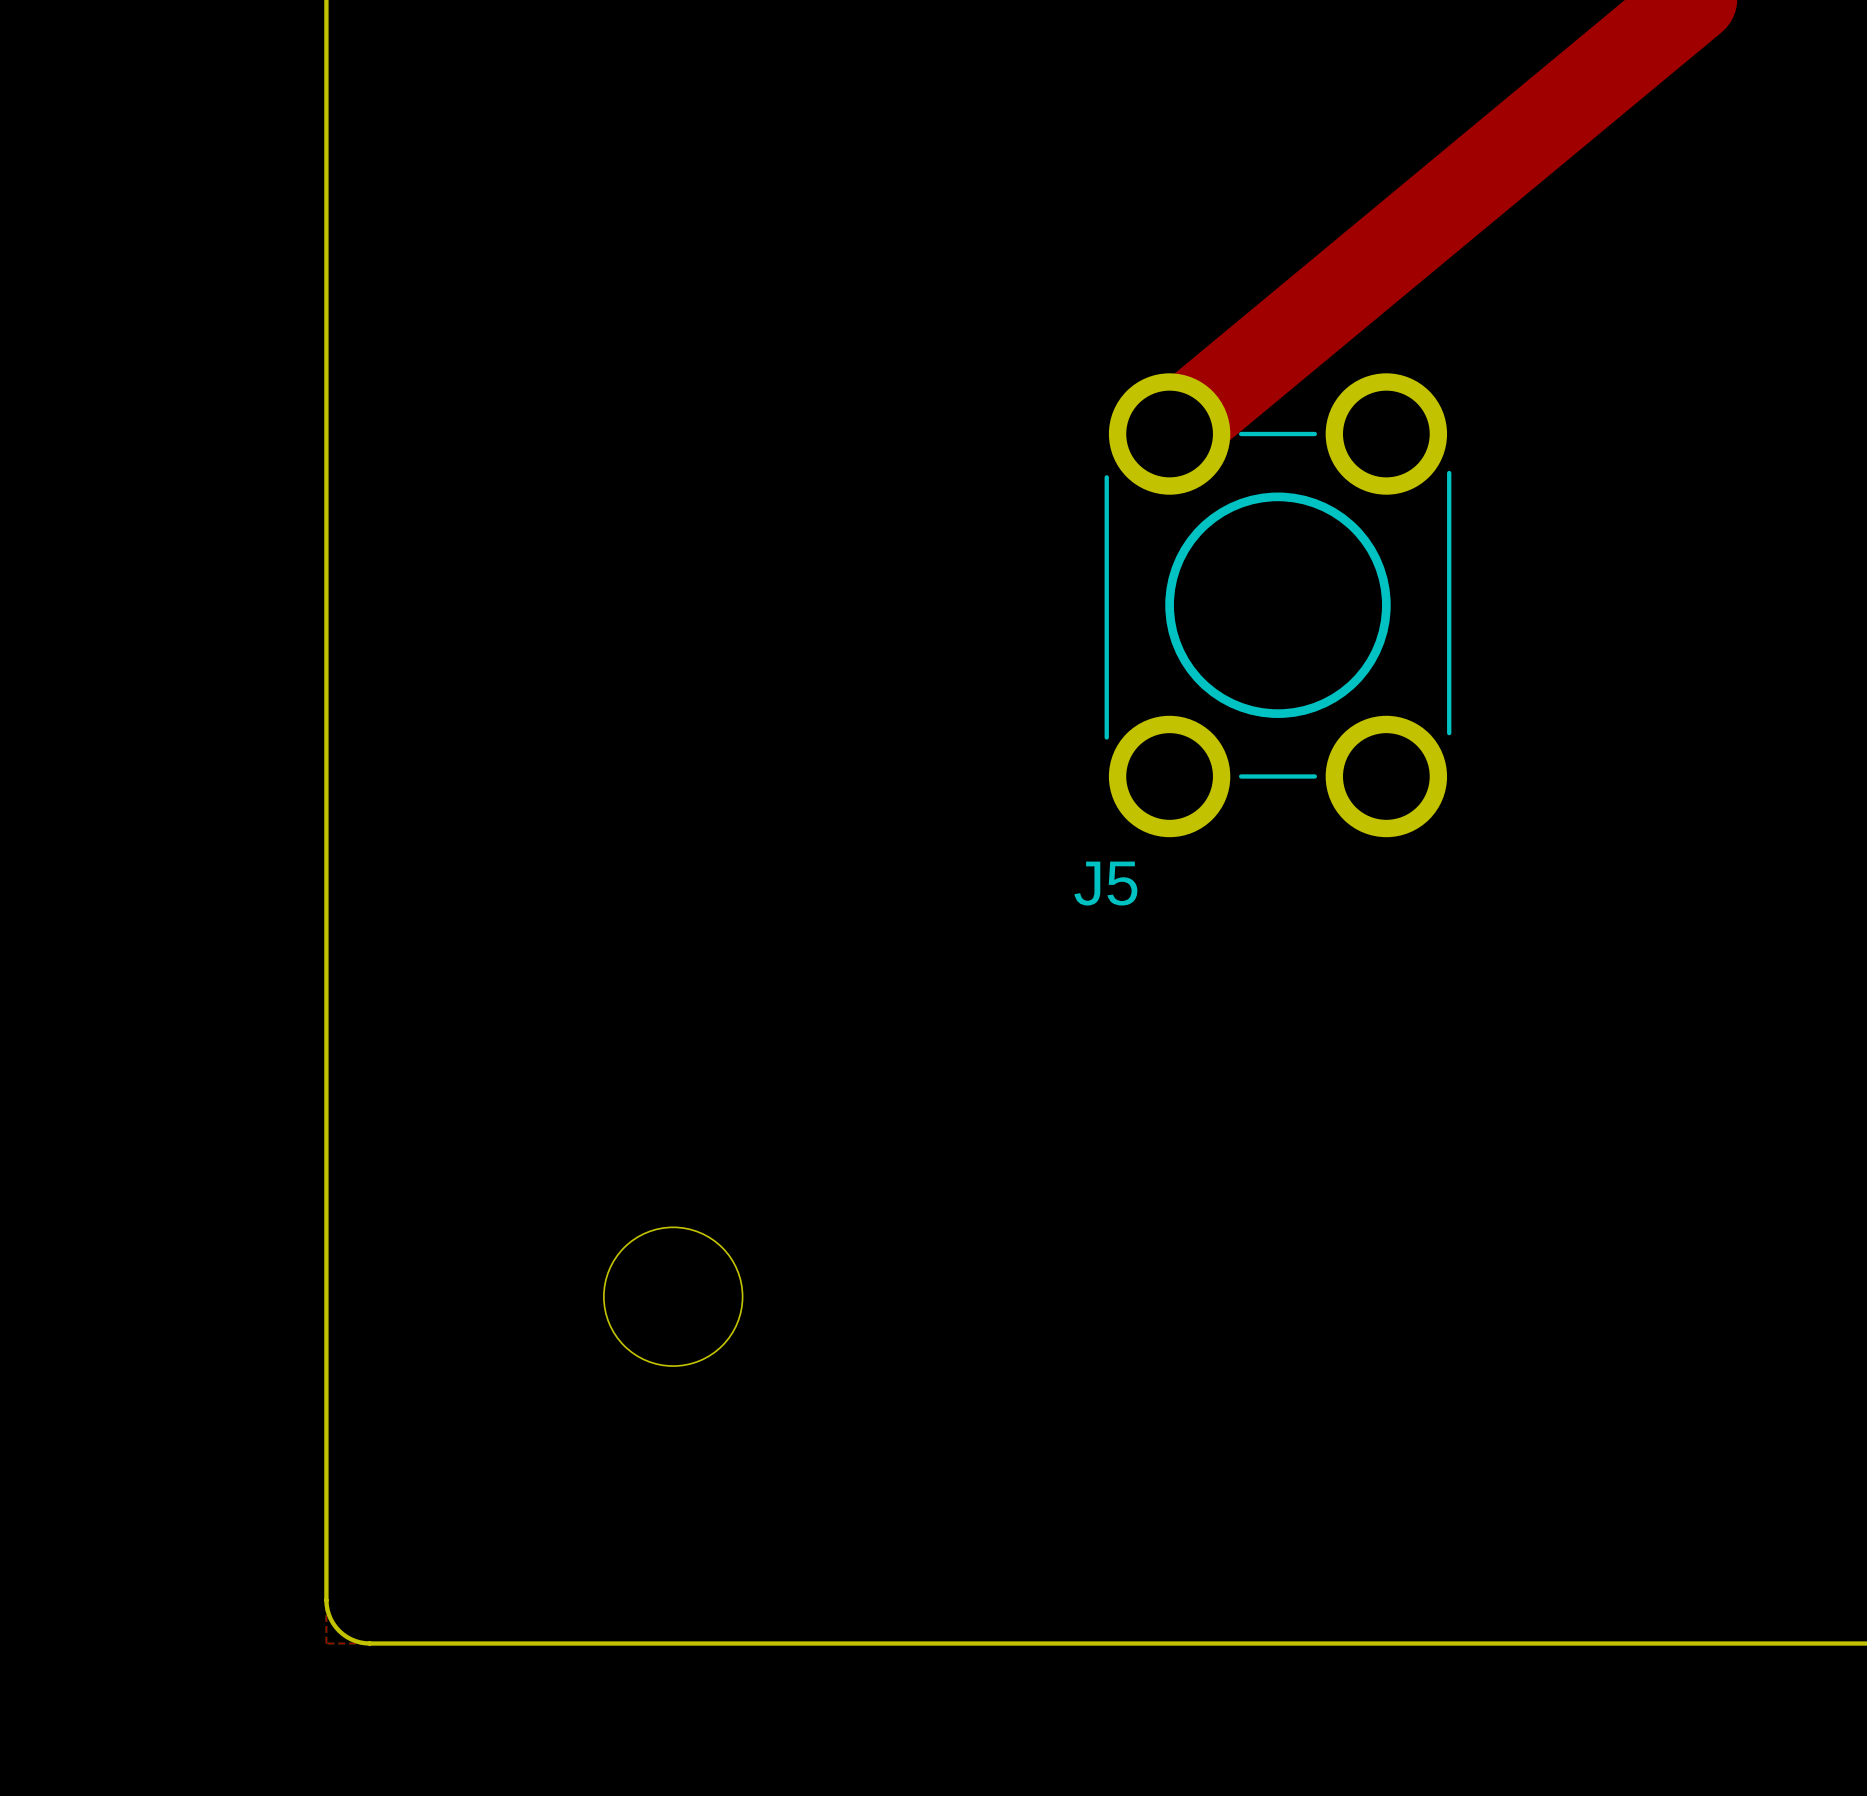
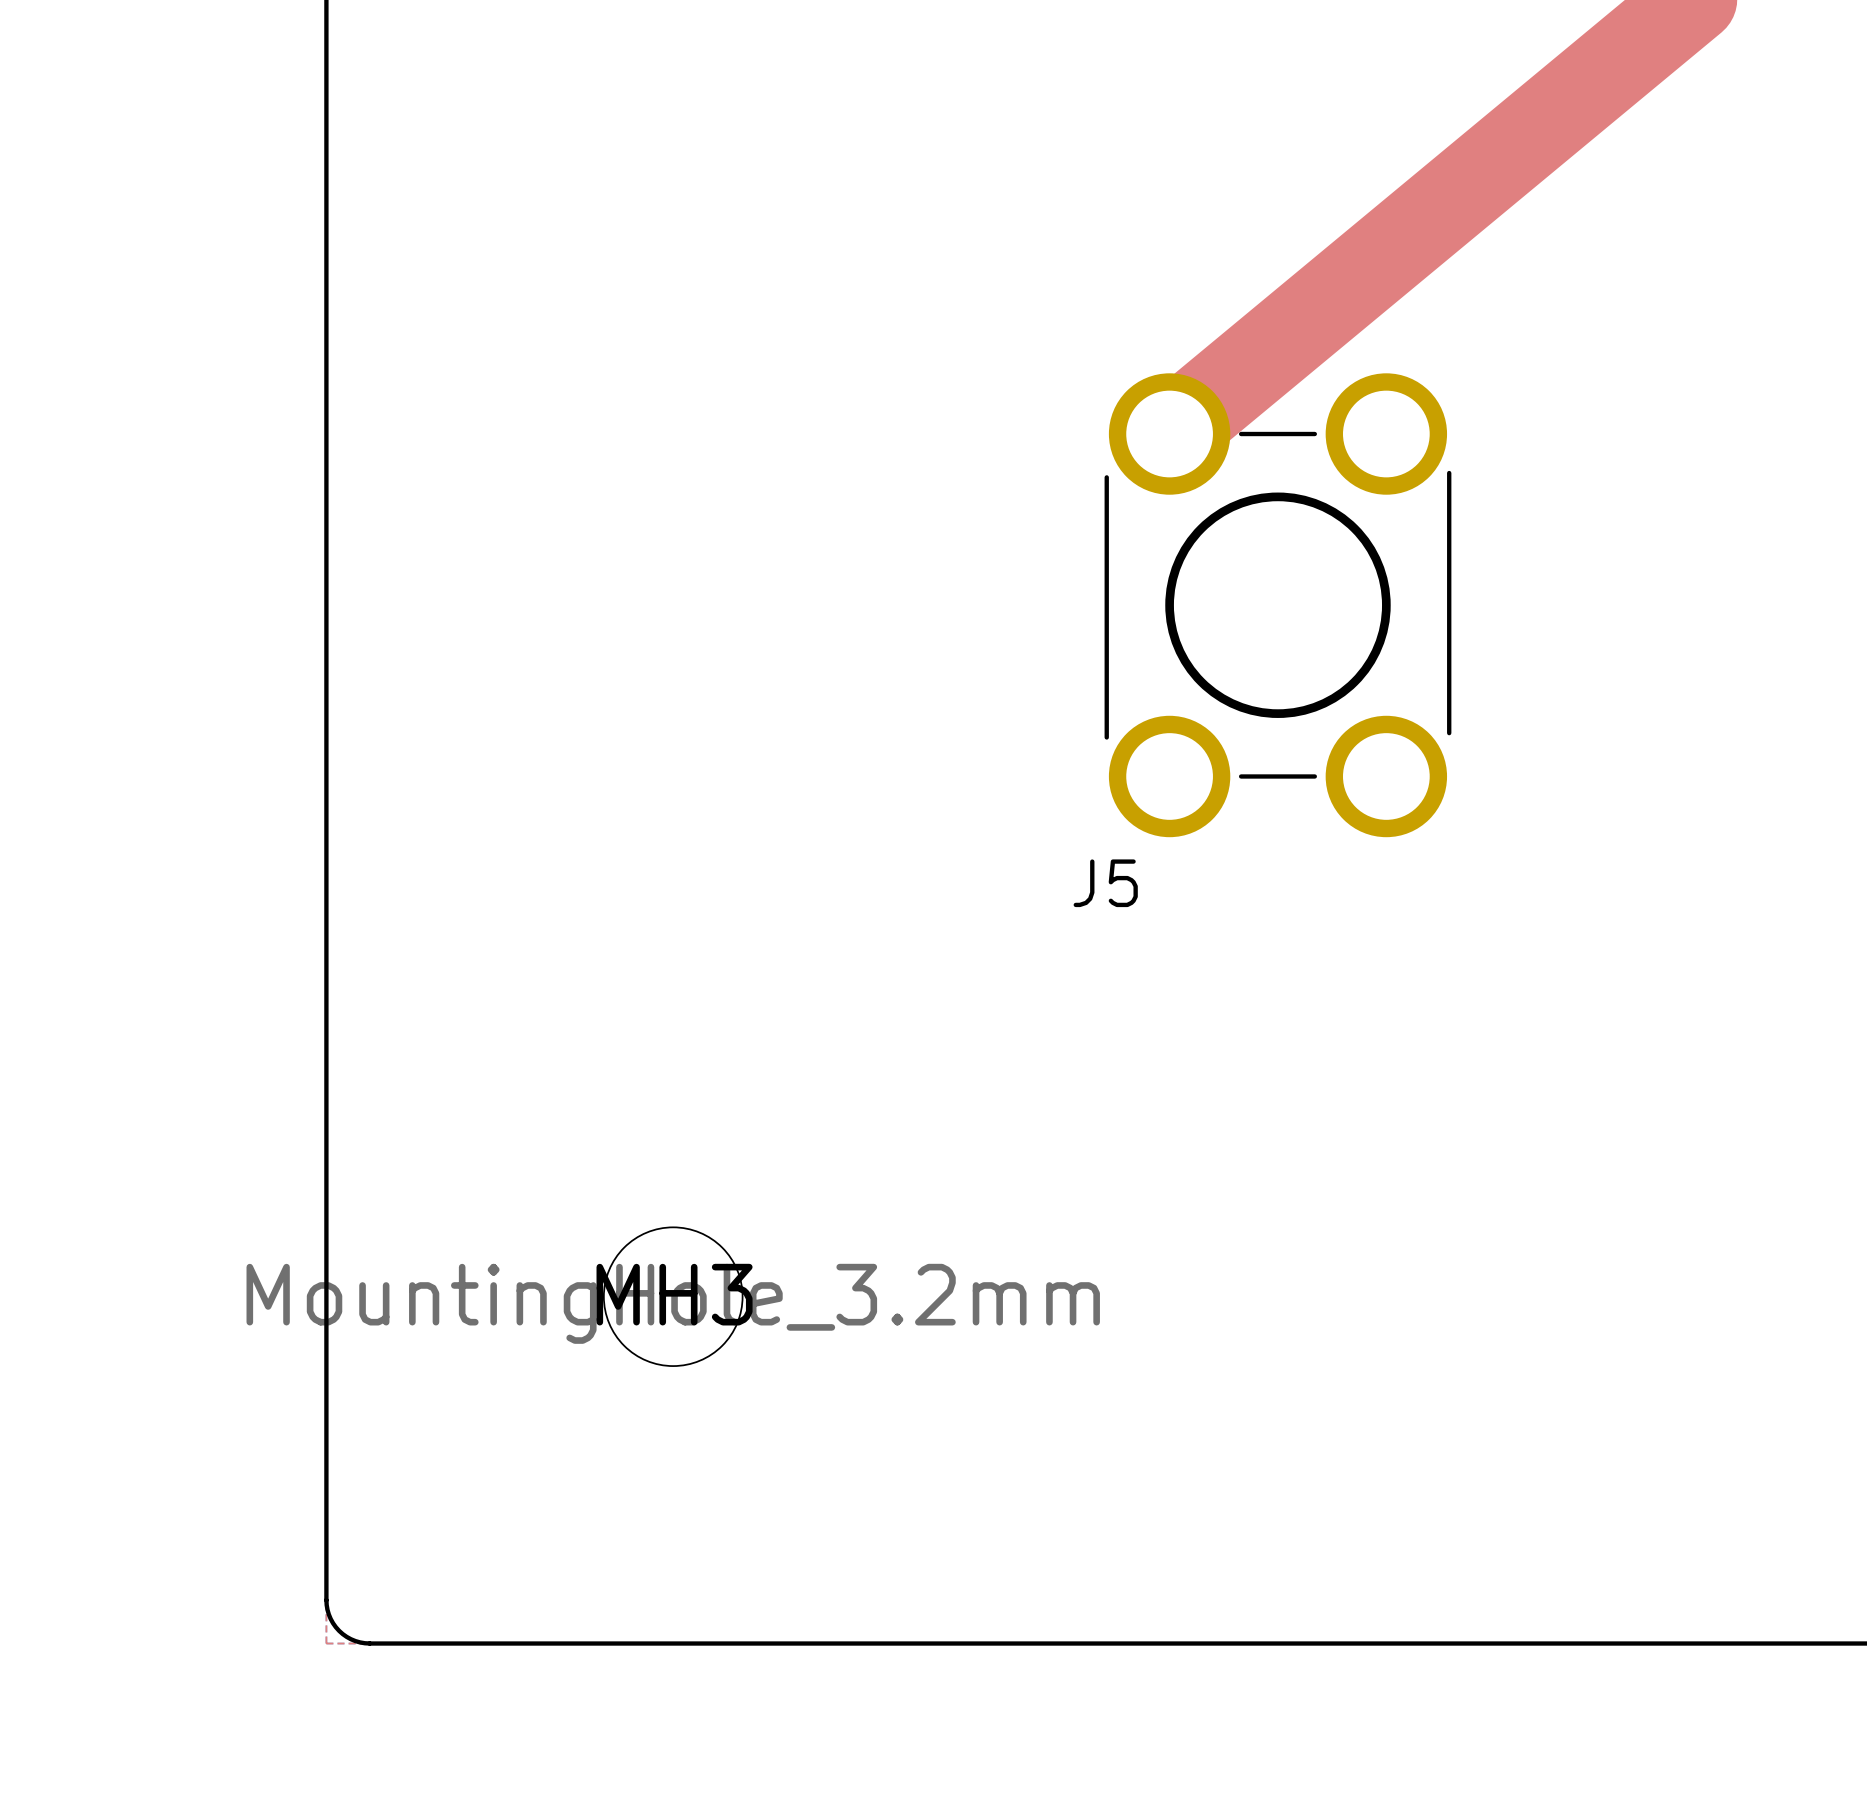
MH3 name: none -> MH3 (674, 1294)
MH3 value: none -> MountingHole_3.2mm (673, 1303)

